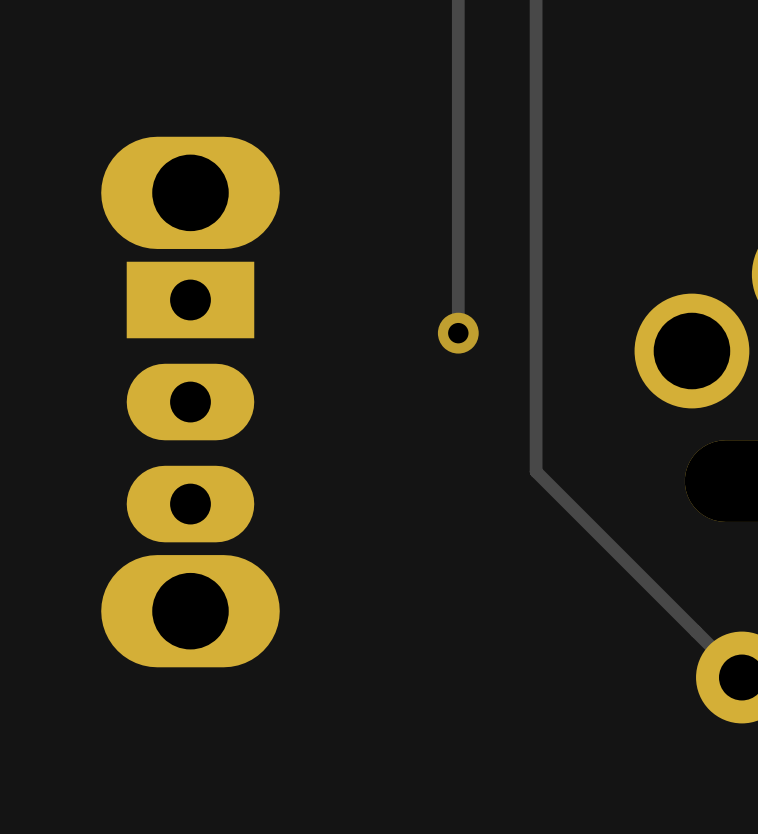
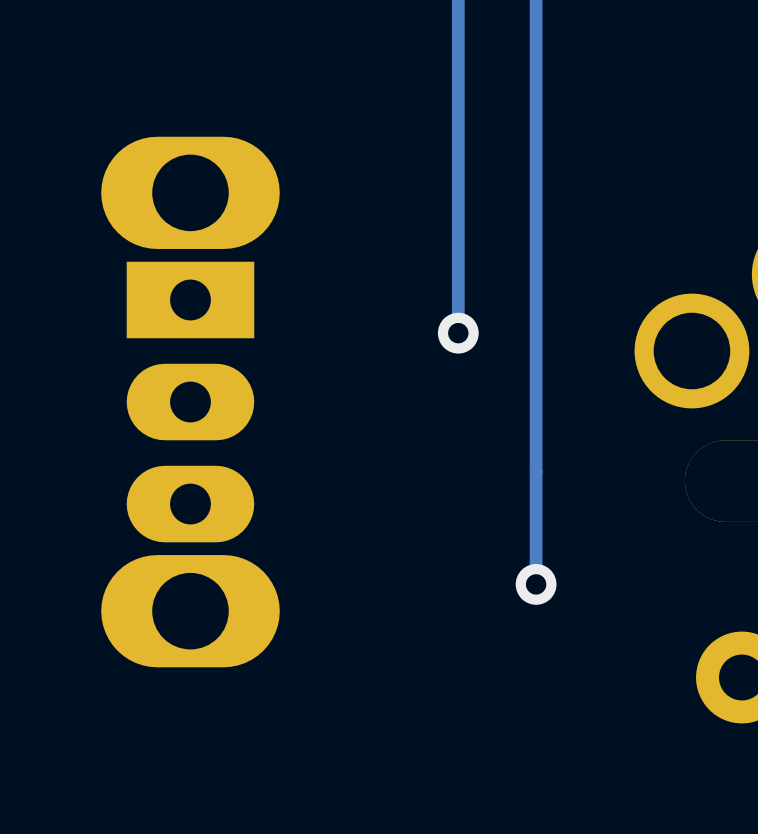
track: (536, 471) (741, 677) -> (536, 471) (536, 584)
via: none -> (536, 584)

